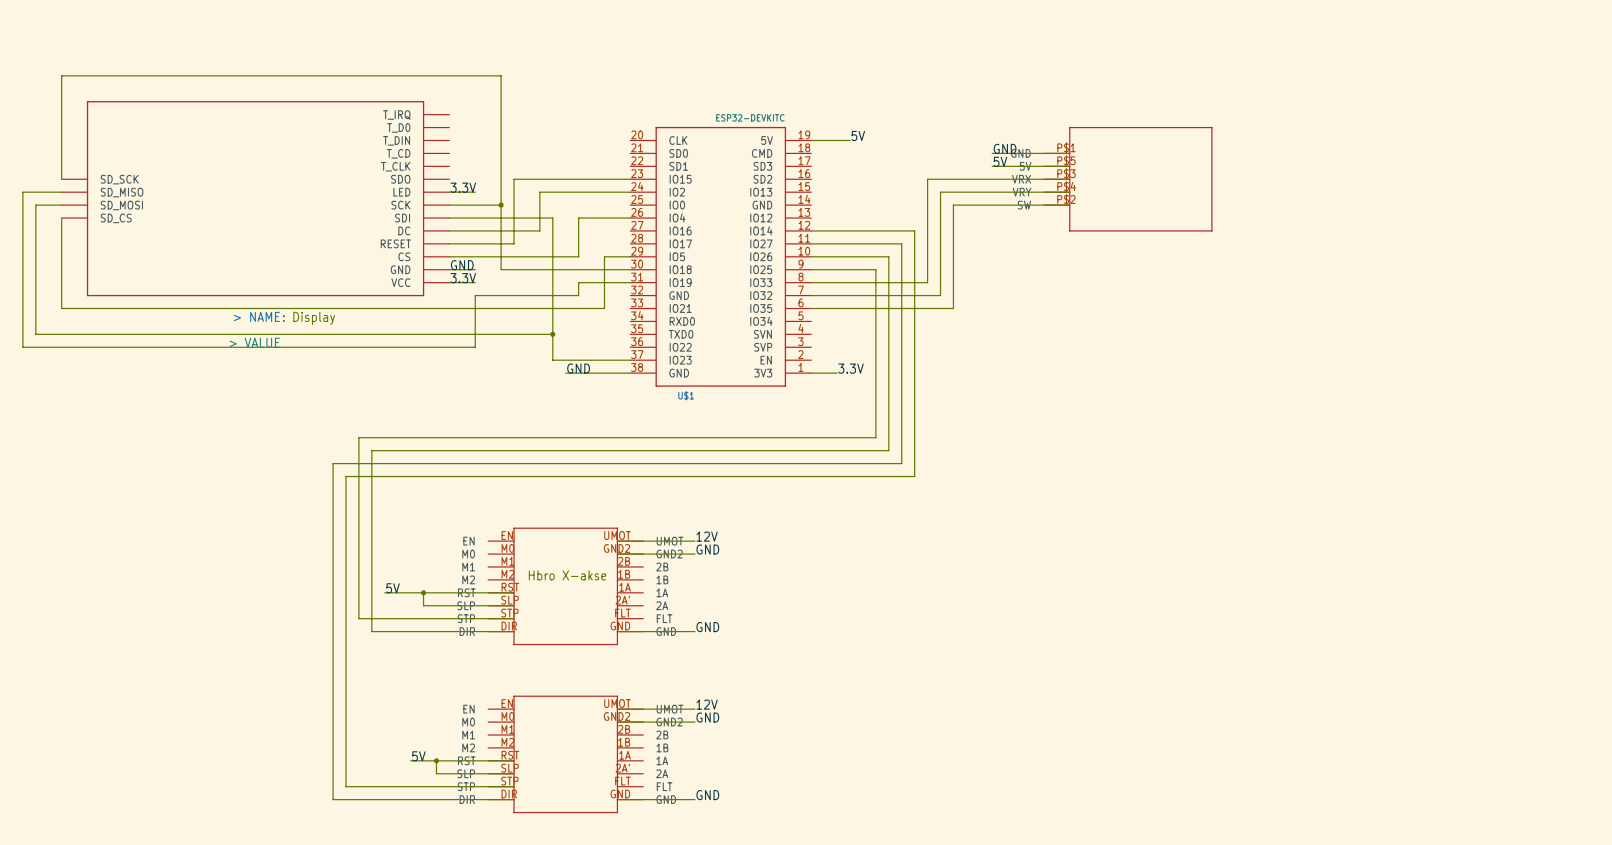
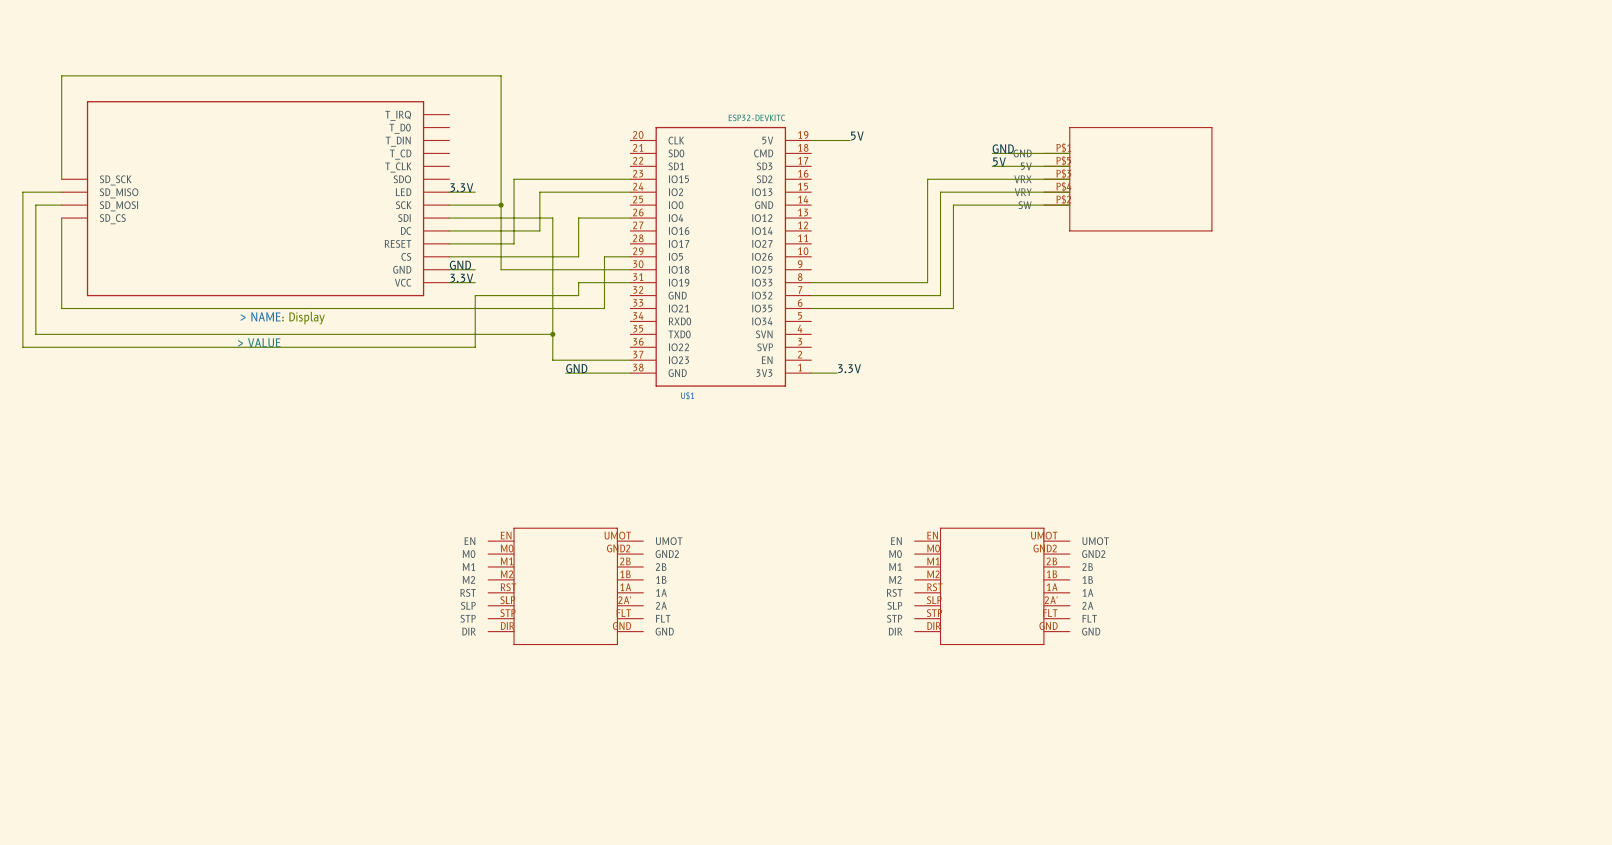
wire: (811, 230) (914, 230) (914, 476) (346, 476) (346, 786) (514, 786) -> none
wire: (811, 243) (901, 243) (901, 463) (333, 463) (333, 799) (514, 799) -> none
wire: (811, 256) (888, 256) (888, 450) (371, 450) (371, 631) (514, 631) -> none
wire: (811, 269) (875, 269) (875, 437) (358, 437) (358, 618) (514, 618) -> none
label: 12V (707, 536) -> none
wire: (617, 541) (694, 541) -> none
label: GND (707, 549) -> none
wire: (617, 554) (694, 554) -> none
text: Hbro X-akse (567, 575) -> none
part: none -> (992, 586)
label: 5V (393, 588) -> none
wire: (384, 592) (514, 592) -> none
wire: (423, 592) (423, 605) (514, 605) -> none
junction: (423, 592) -> none
label: GND (707, 627) -> none
wire: (617, 631) (694, 631) -> none
label: 12V (707, 704) -> none
wire: (617, 709) (694, 709) -> none
label: GND (707, 717) -> none
wire: (617, 722) (694, 722) -> none
part: (565, 754) -> none
label: 5V (418, 756) -> none
wire: (410, 760) (514, 760) -> none
wire: (436, 760) (436, 773) (514, 773) -> none
junction: (436, 760) -> none
label: GND (707, 795) -> none
wire: (617, 799) (694, 799) -> none

